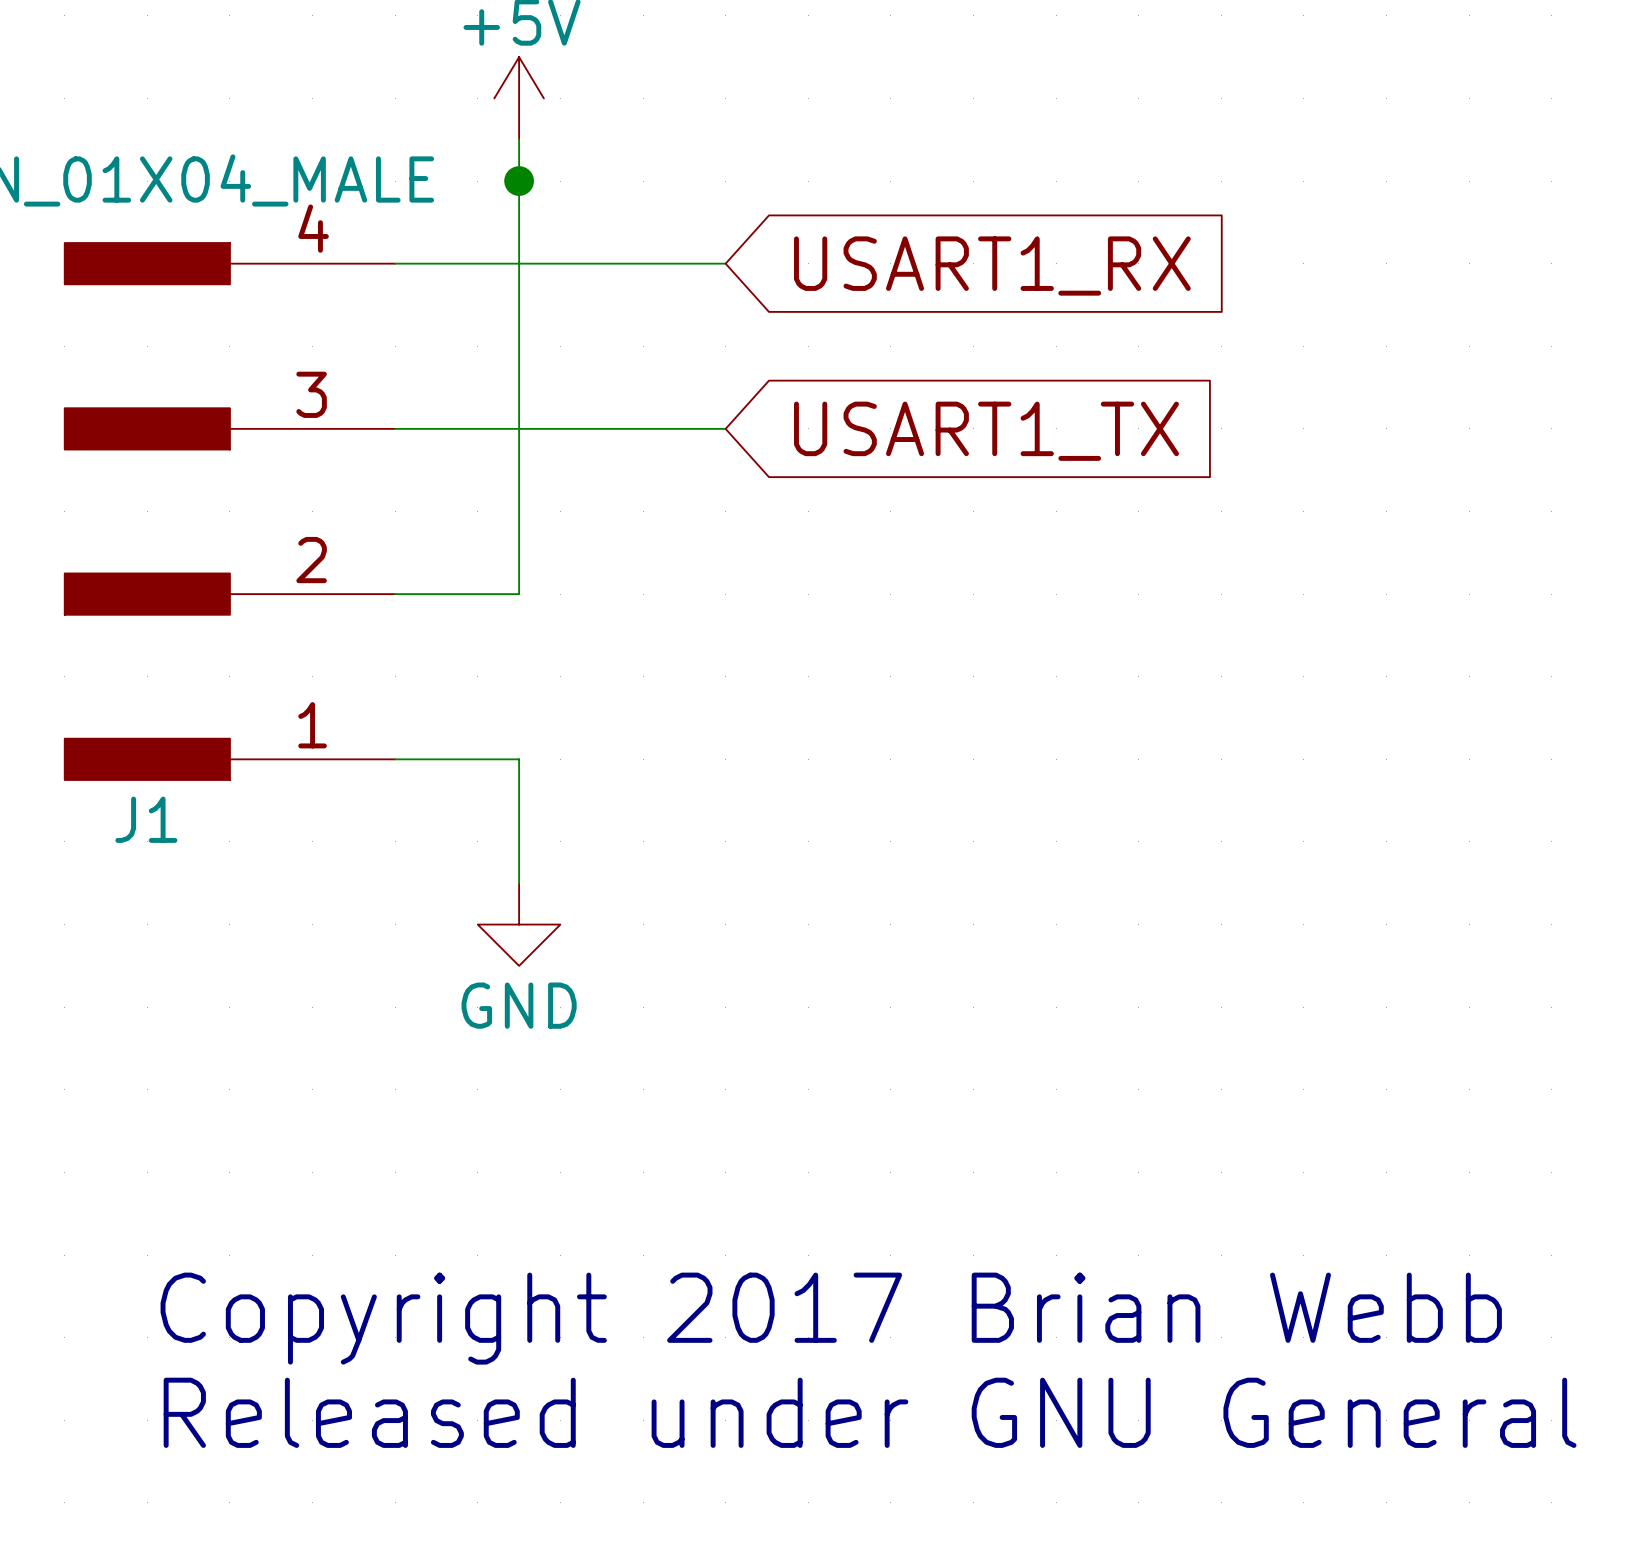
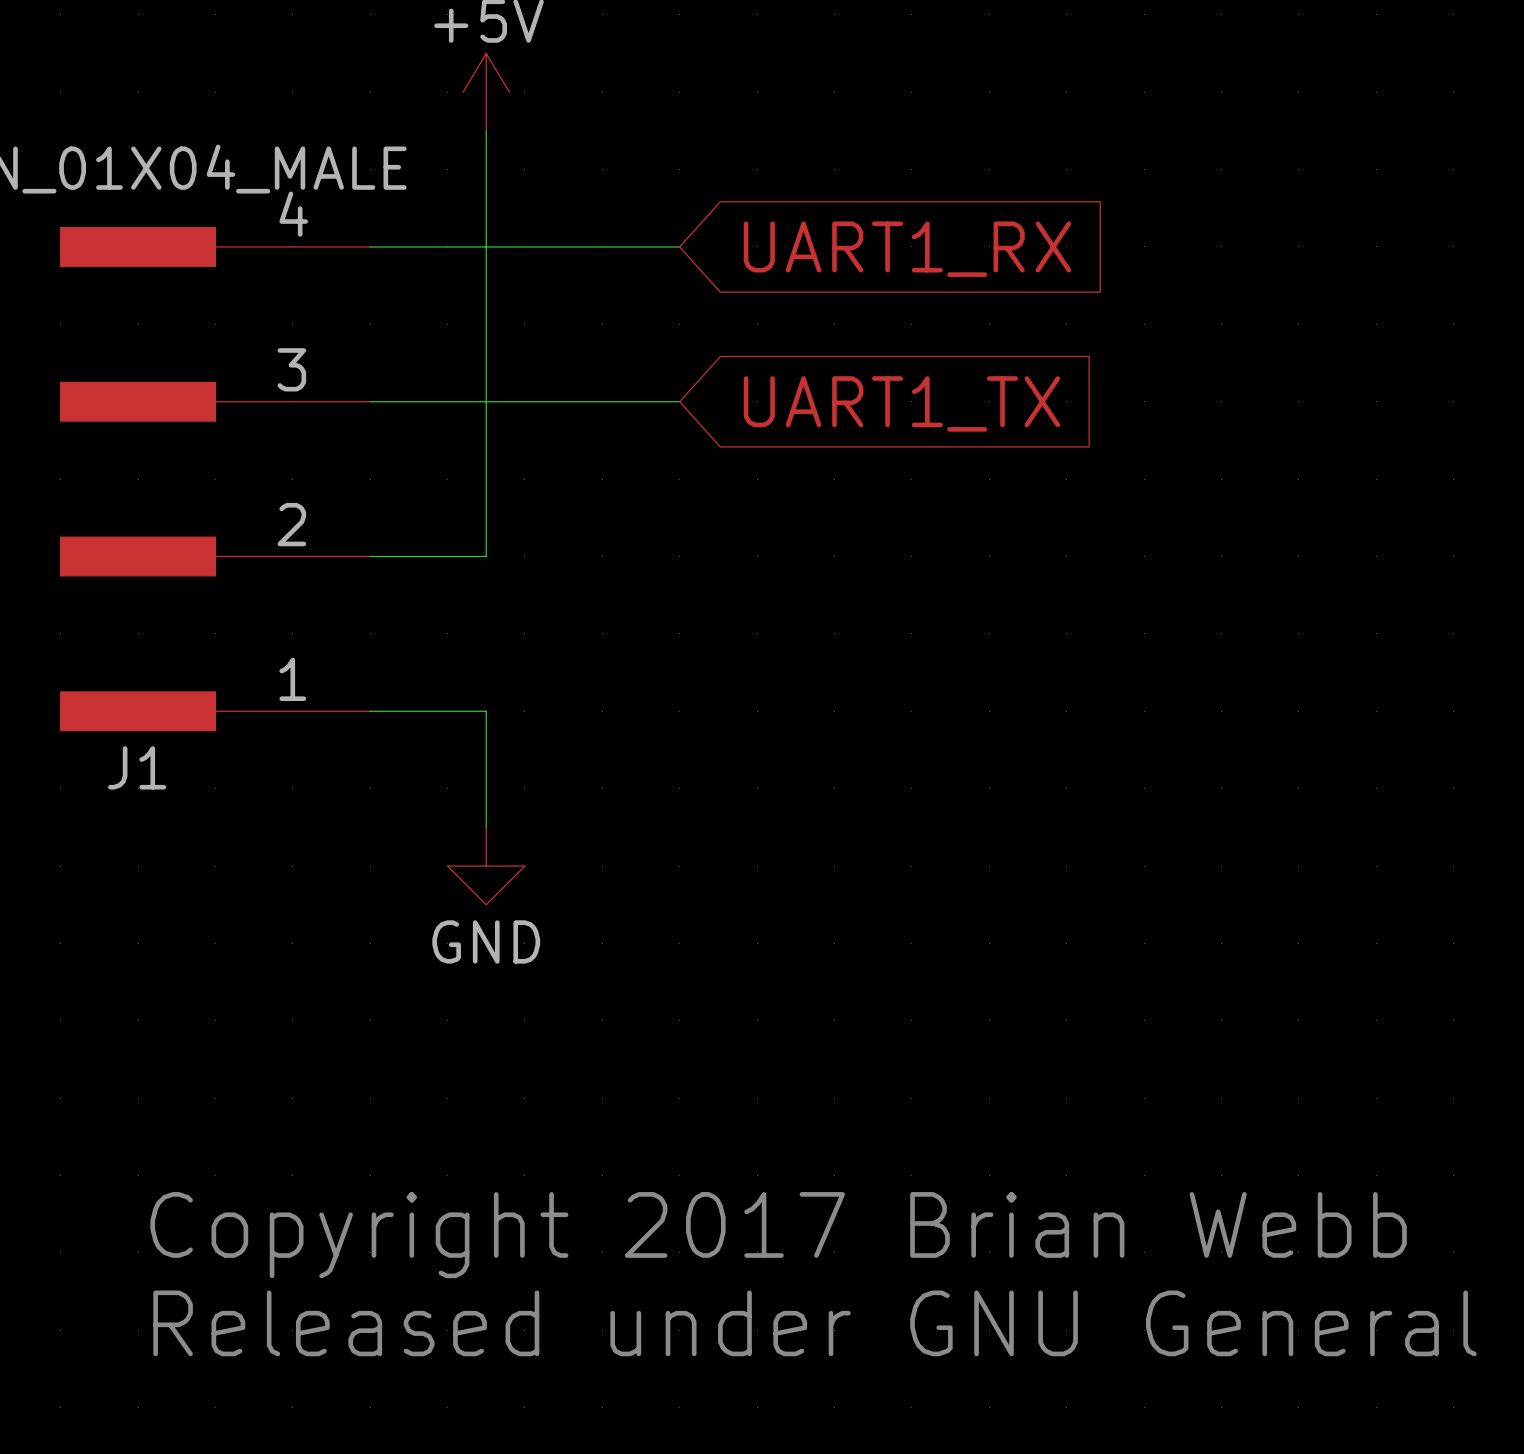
junction: (519, 181) -> none
global label: USART1_RX (992, 266) -> UART1_RX (907, 249)
global label: USART1_TX (986, 431) -> UART1_TX (901, 403)

